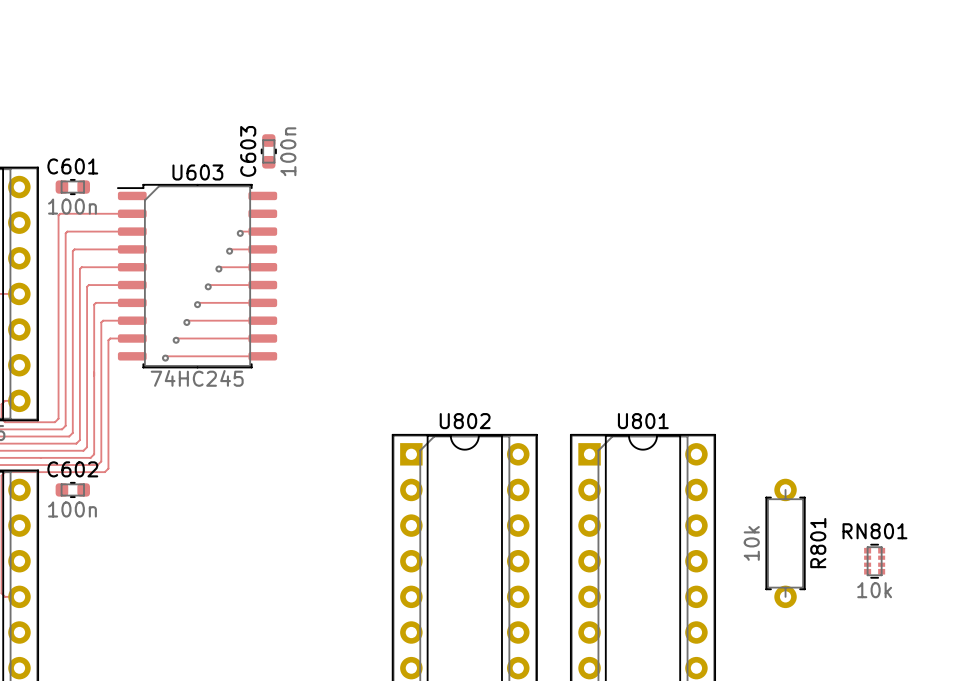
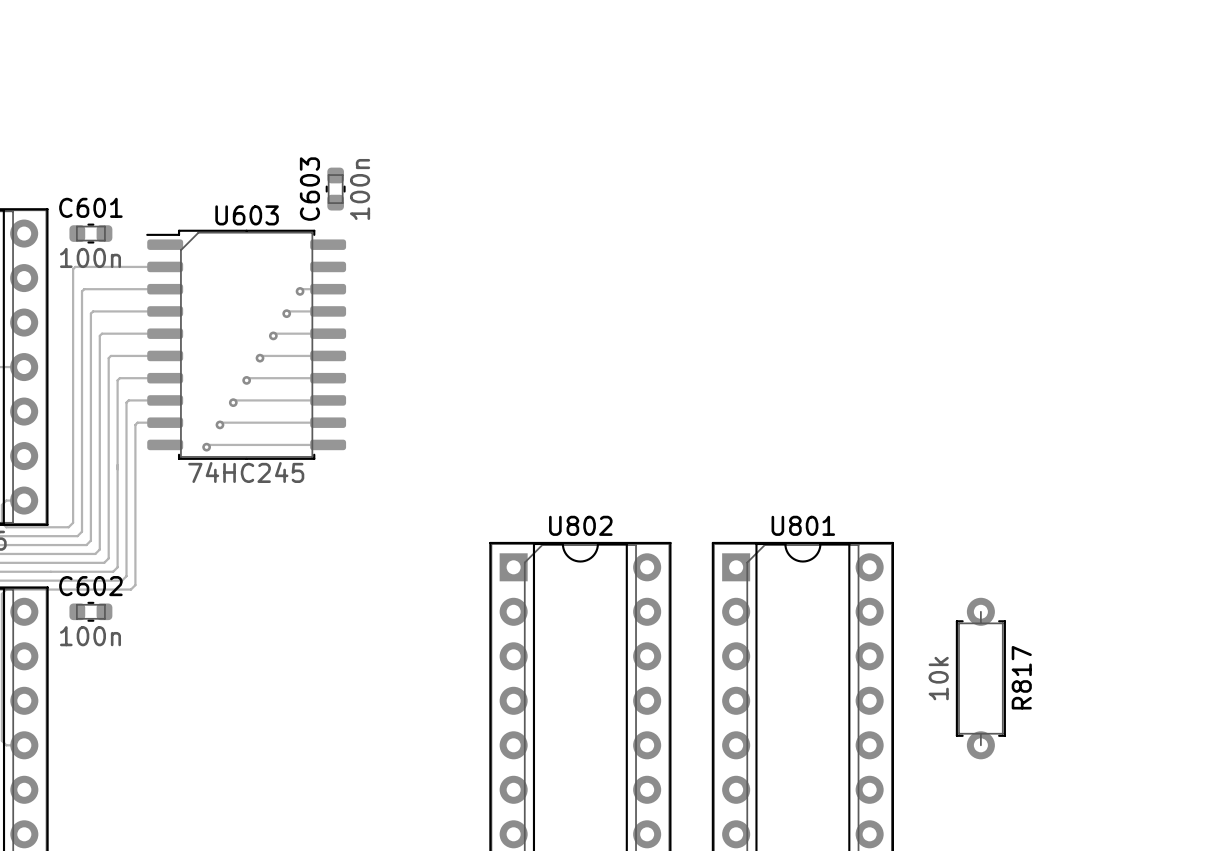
R801 name: R801 (818, 543) -> R817 (1021, 677)
RN801: 10k (874, 561) -> none

